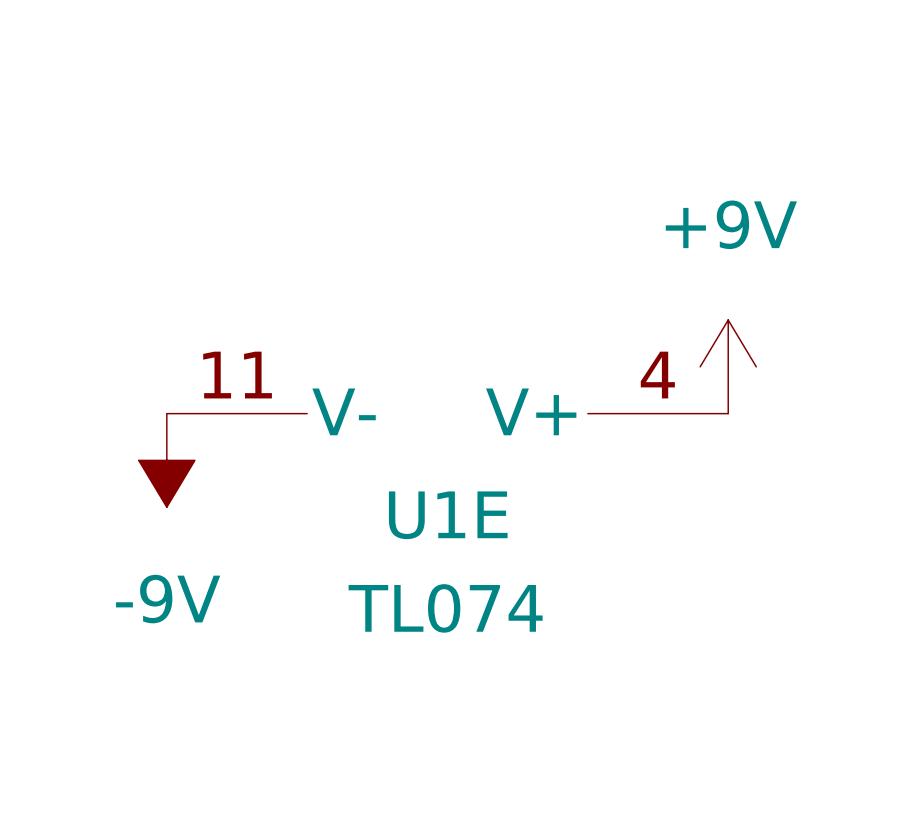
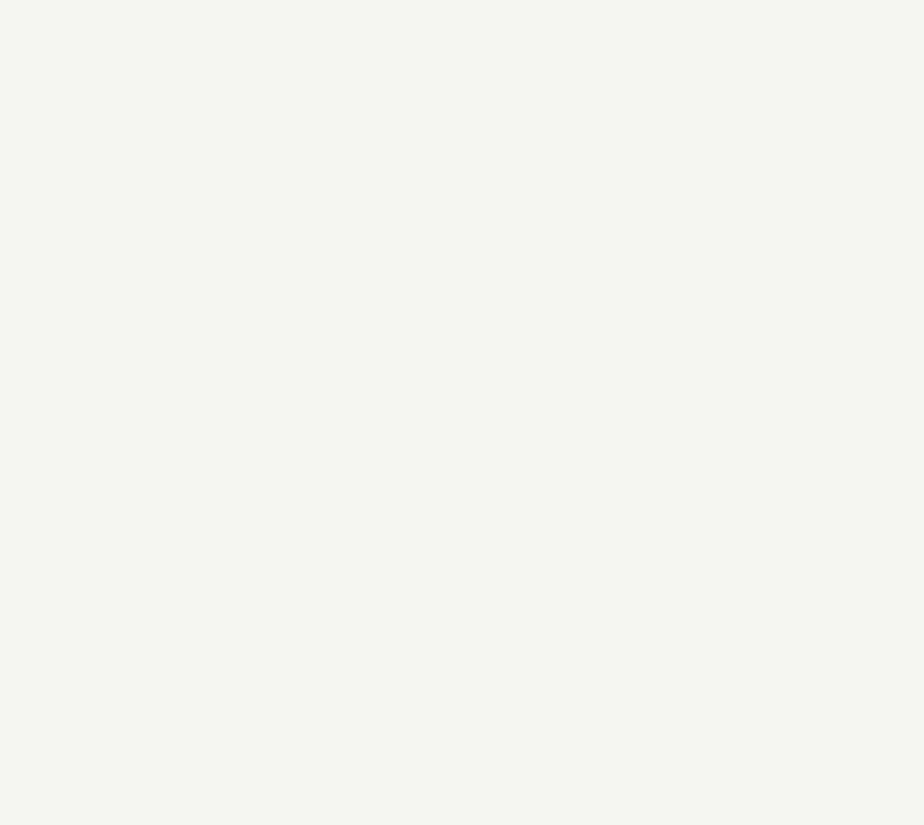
power symbol: +9V (728, 366) -> none
U1E: TL074 (447, 413) -> none
power symbol: -9V (166, 460) -> none

